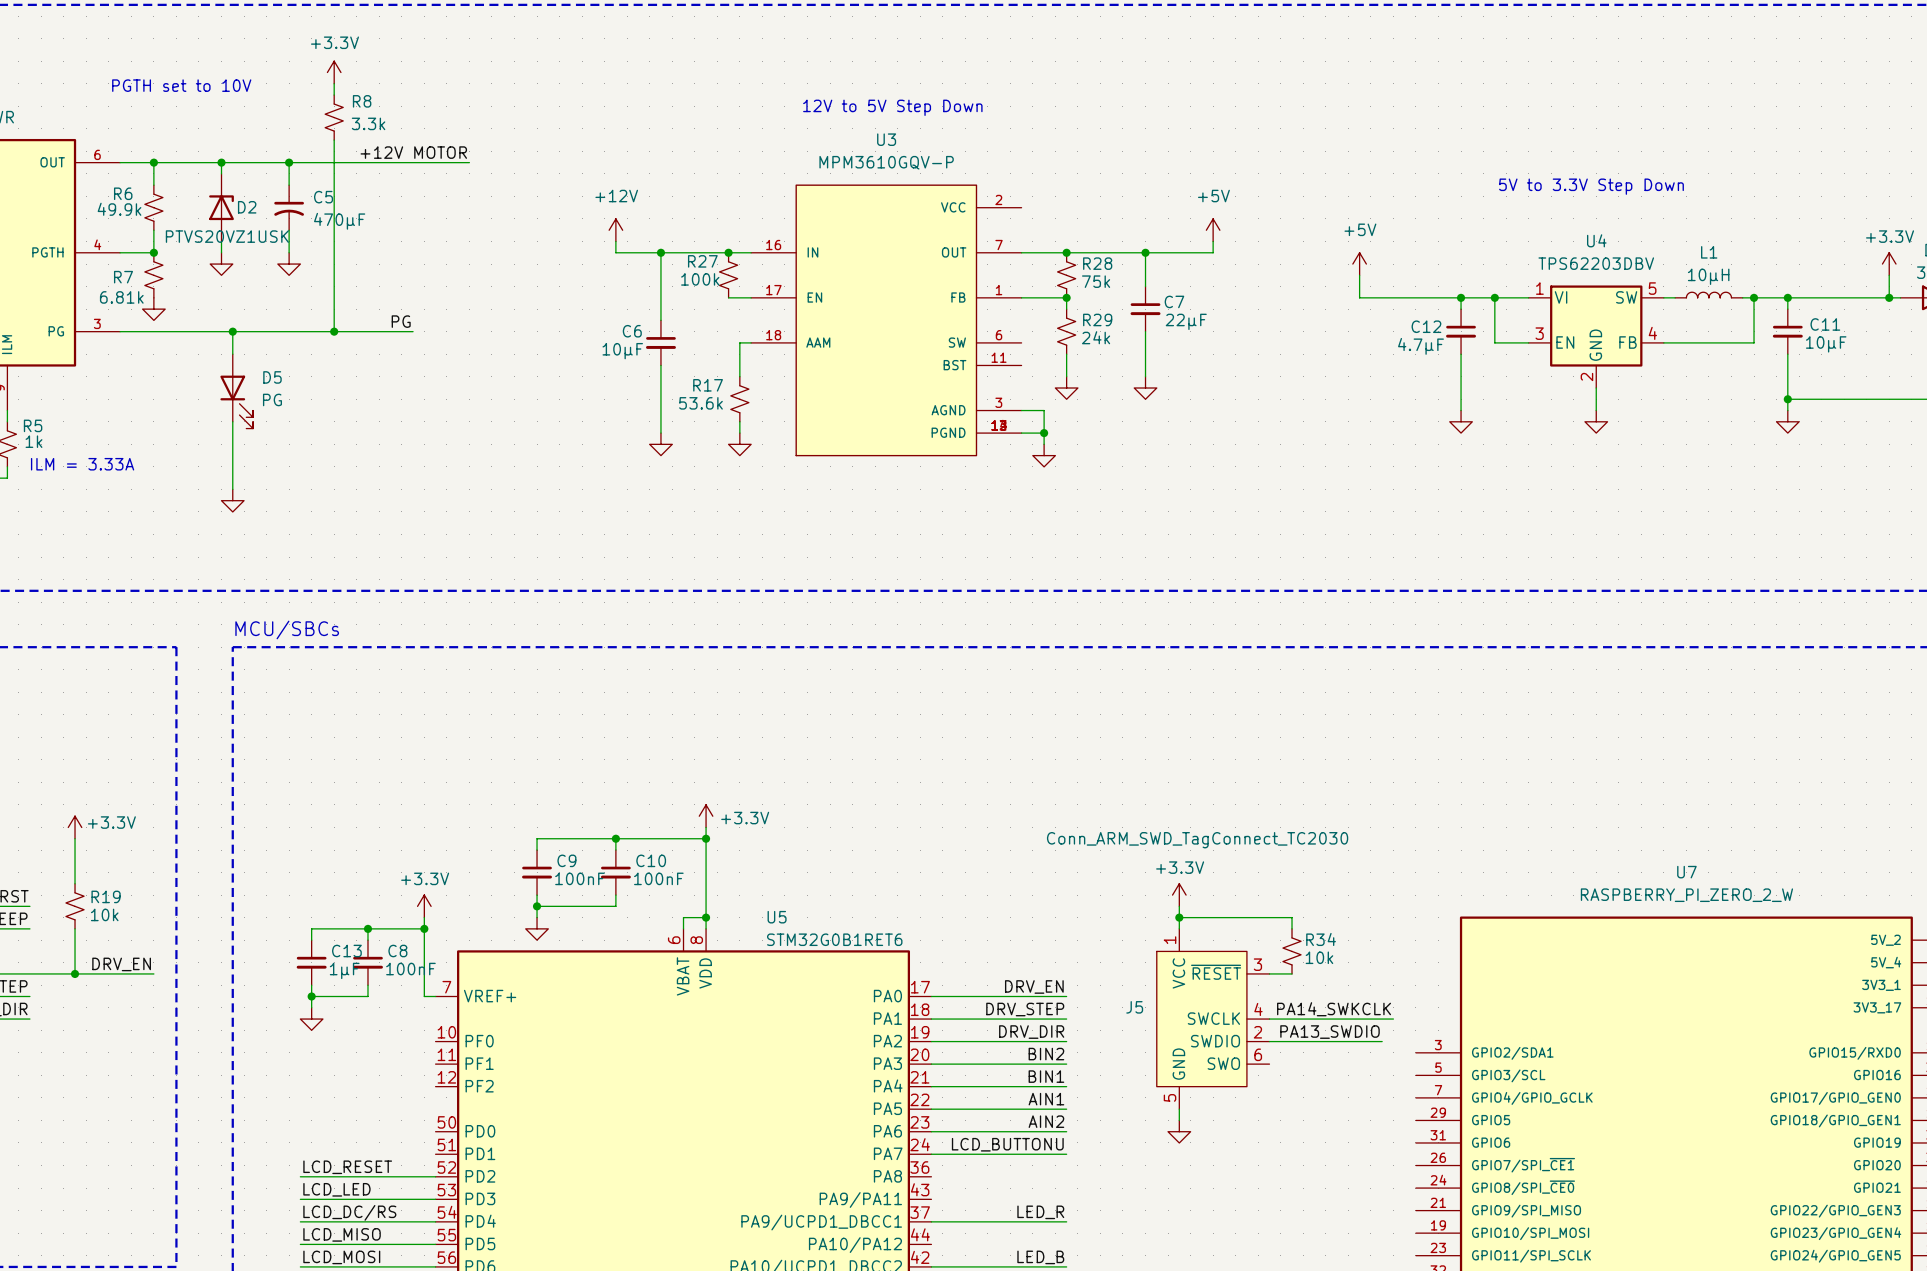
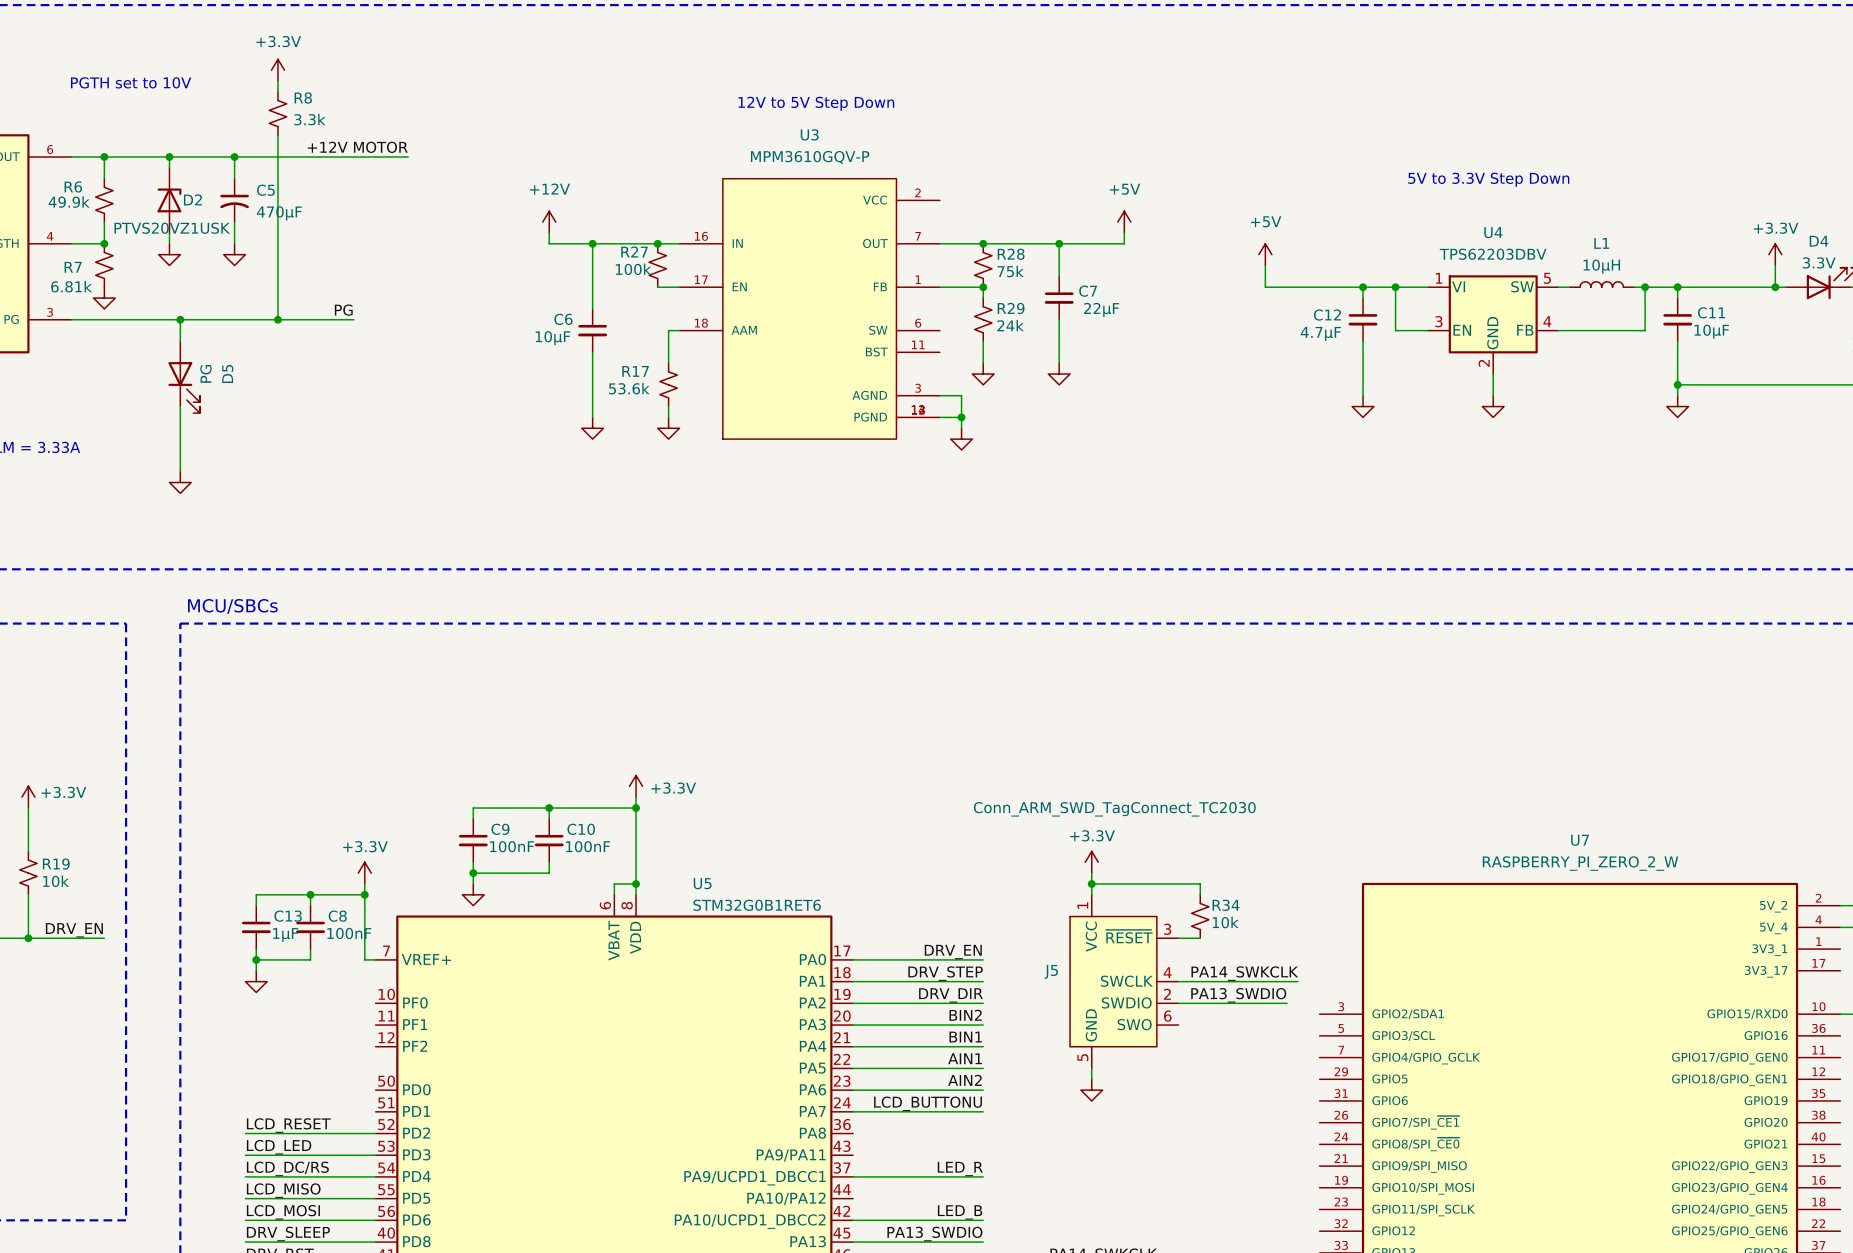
D5 name rotation: 0° (272, 377) -> 90° counterclockwise (227, 373)
D5 value rotation: 0° (272, 399) -> 90° counterclockwise (205, 373)

